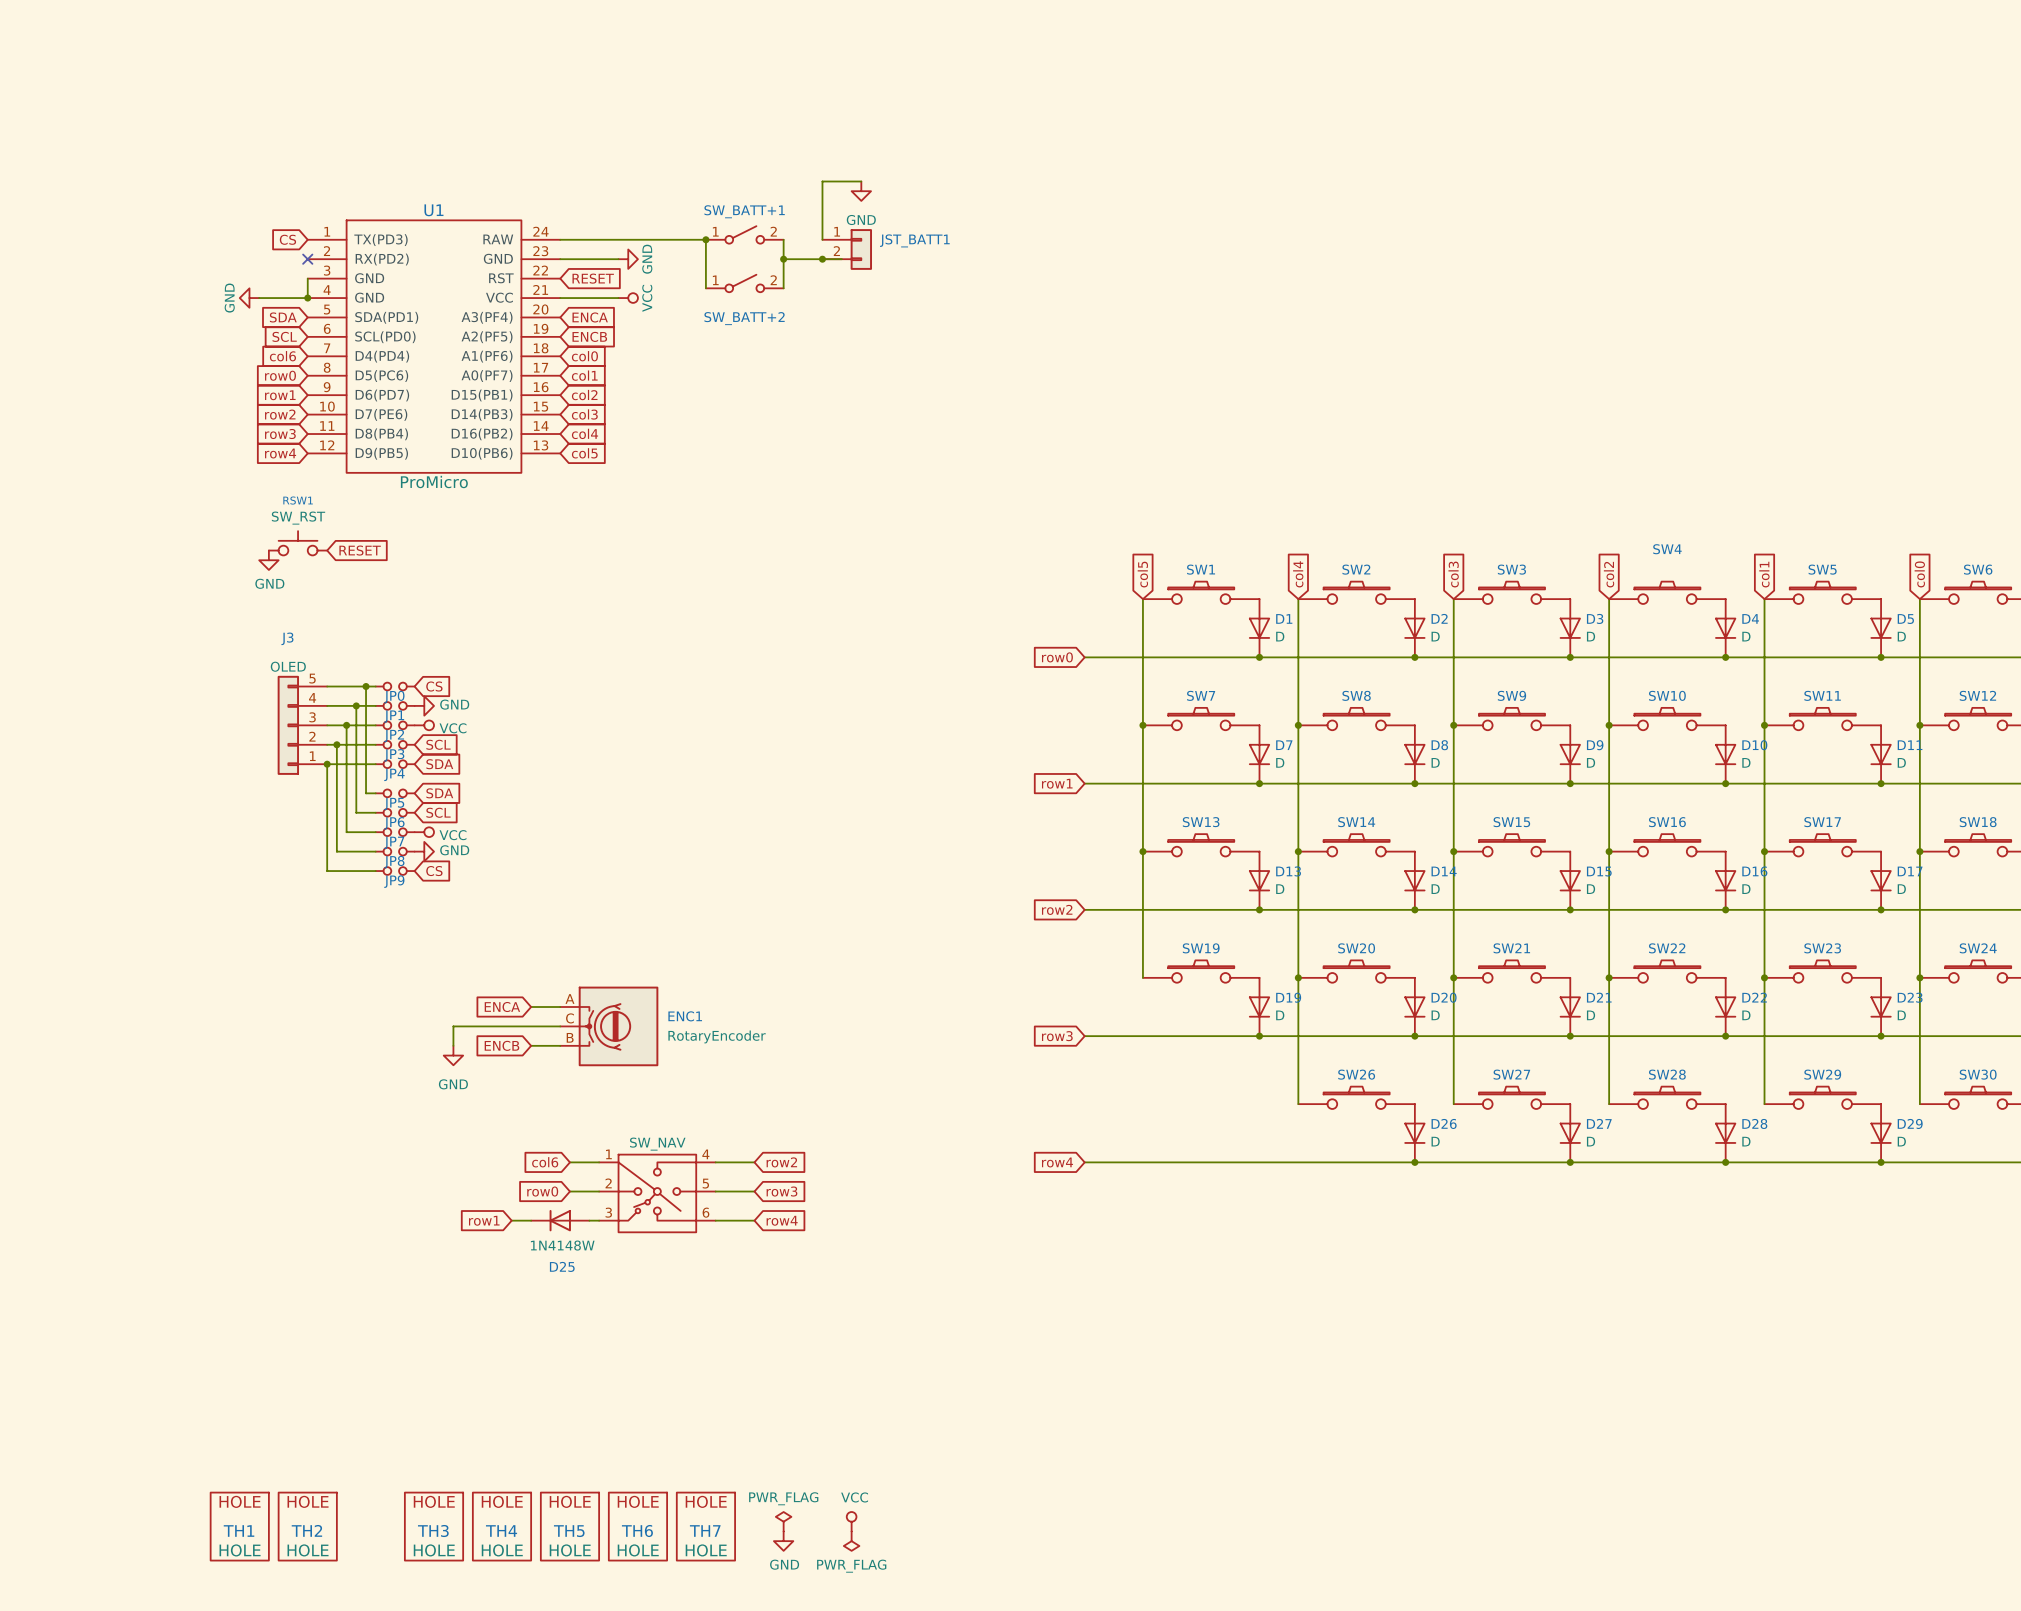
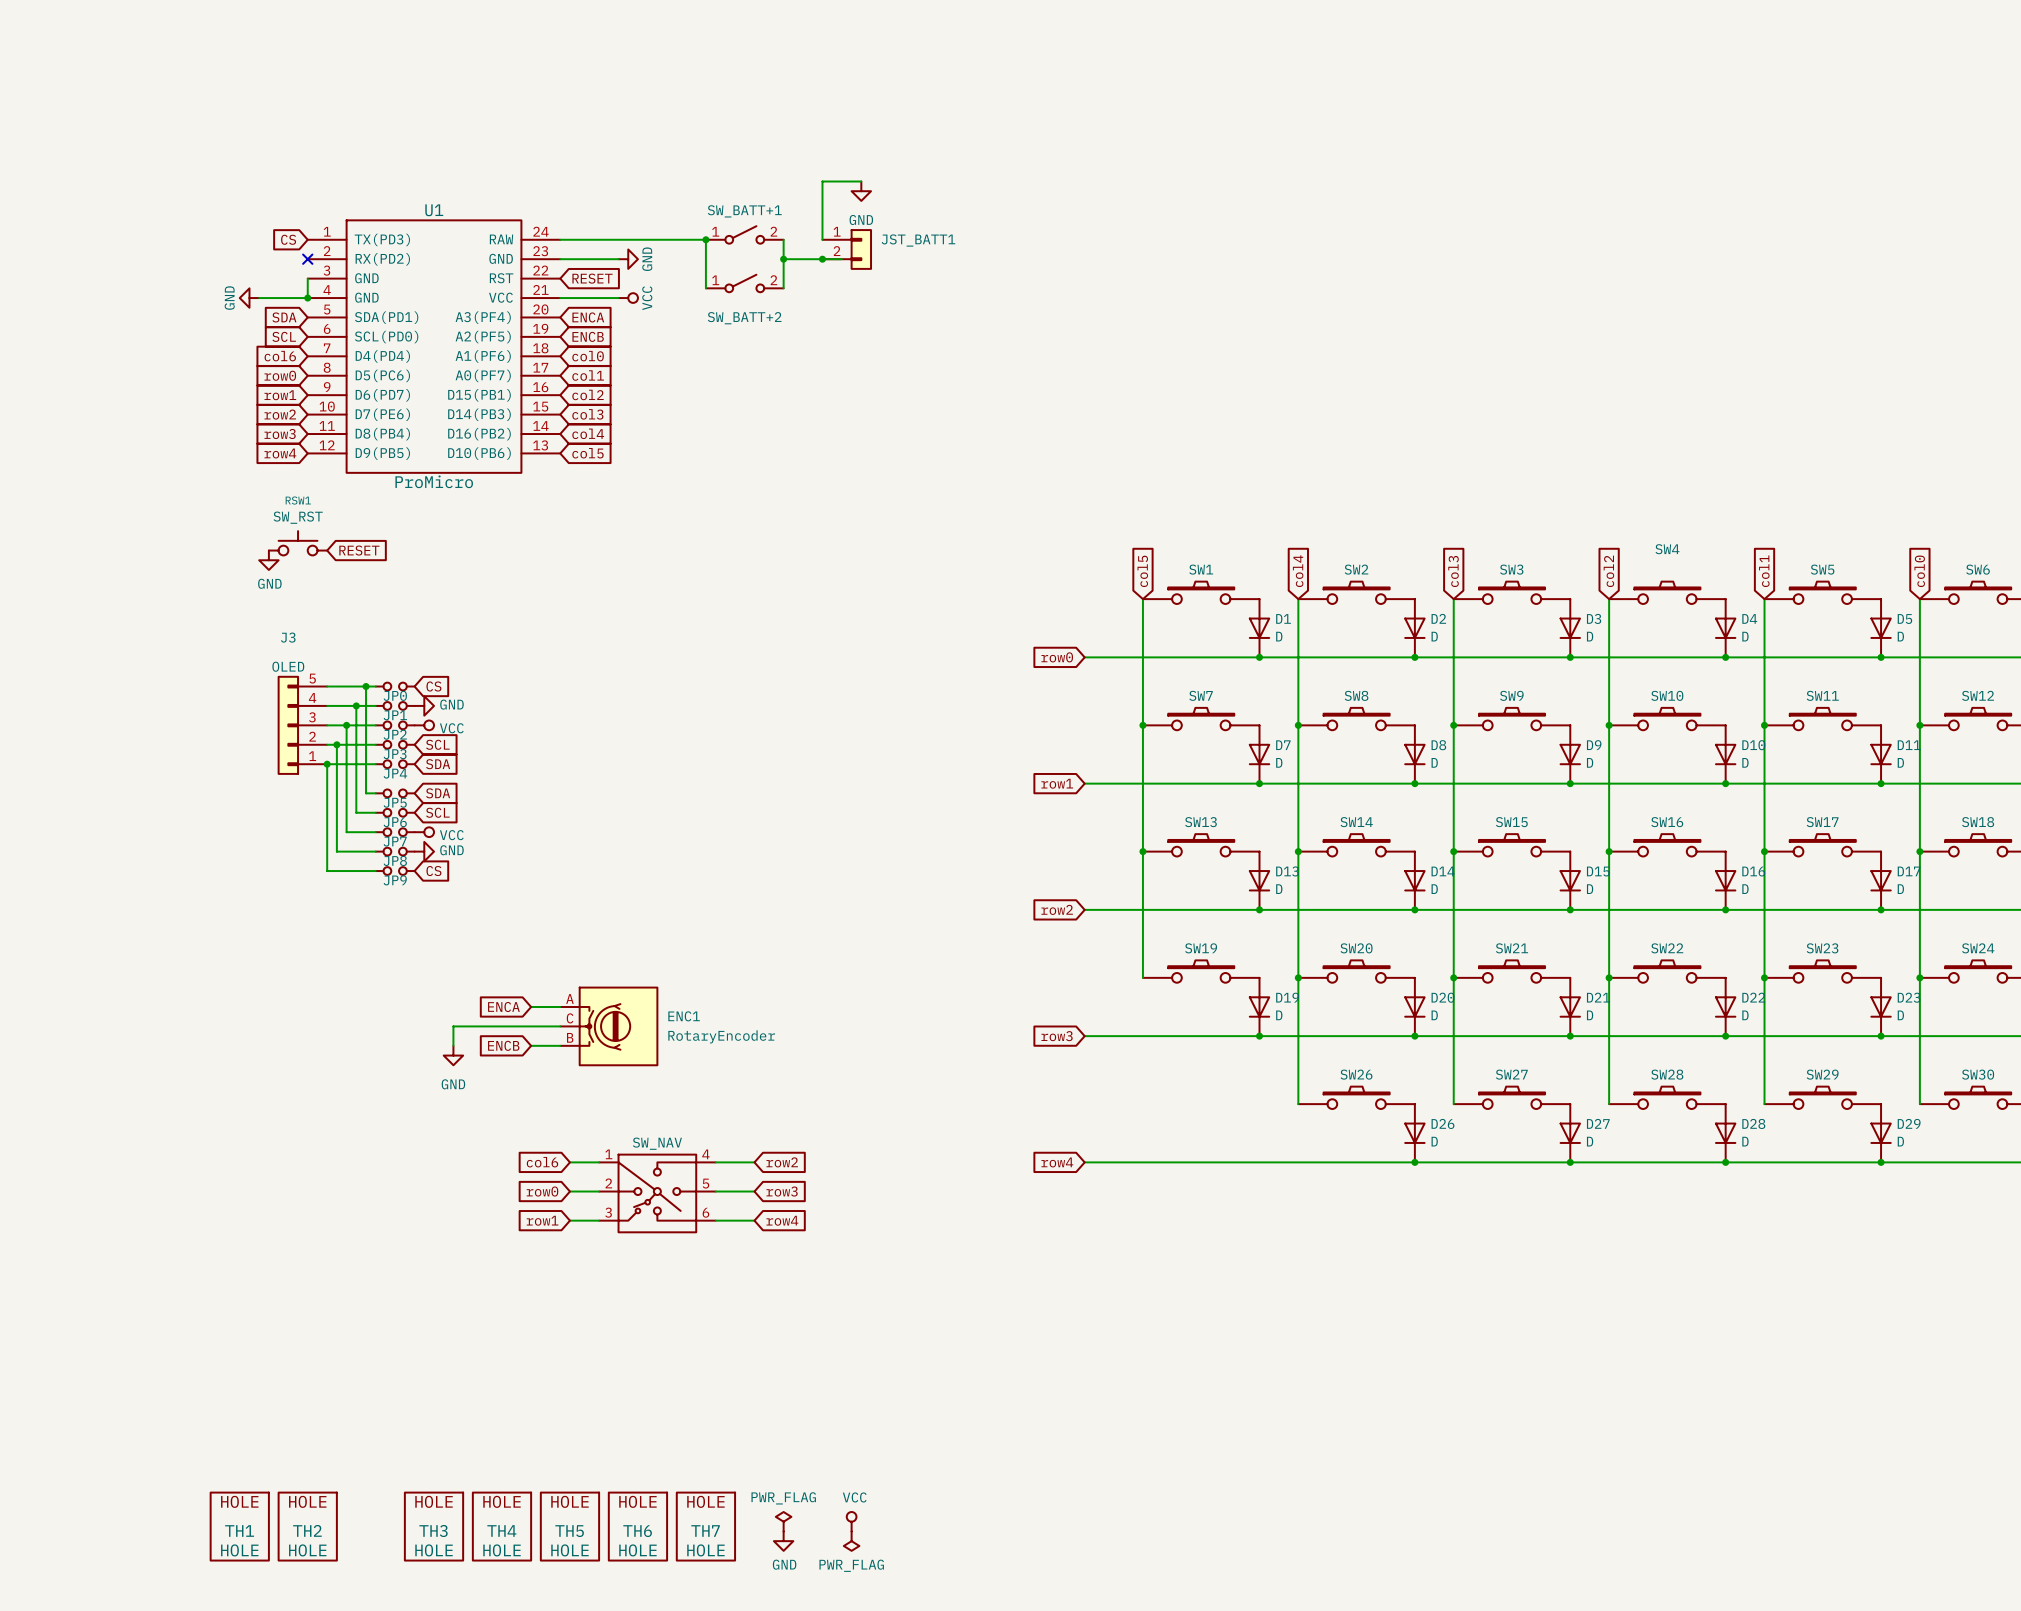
global label position: row1 (484, 1220) -> row1 (542, 1220)
D25: 1N4148W (560, 1220) -> none

